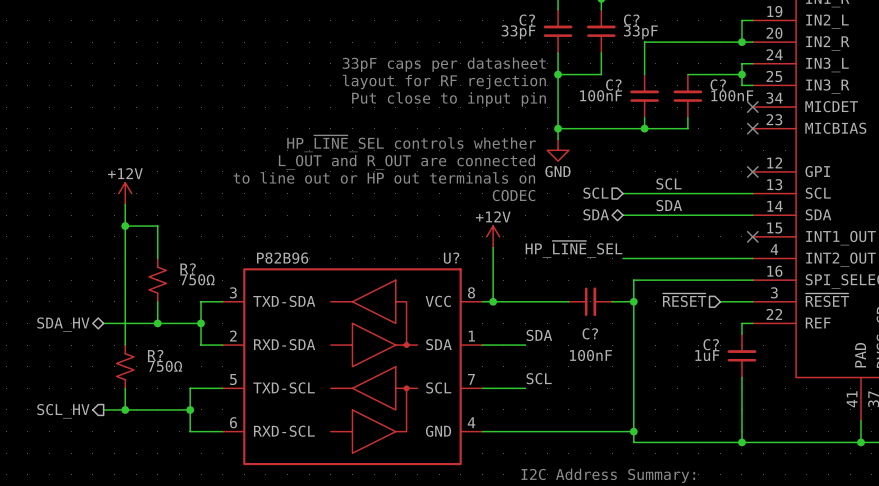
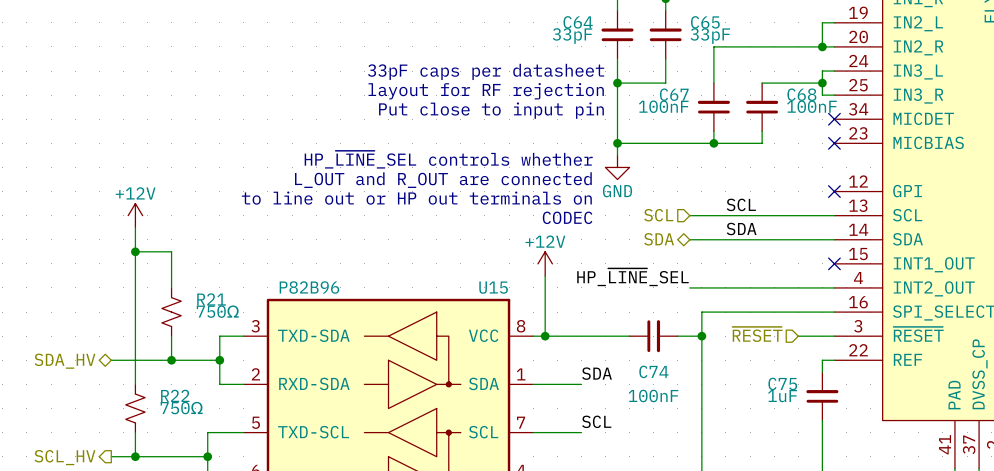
C? name: C? (527, 20) -> C64 (578, 22)
C? name: C? (631, 20) -> C65 (705, 22)
C? name: C? (613, 85) -> C67 (674, 94)
C? name: C? (718, 85) -> C68 (801, 94)
U? name: U? (451, 258) -> U15 (493, 287)
R? name: R? (188, 268) -> R21 (211, 299)
C? name: C? (590, 333) -> C74 (653, 371)
C? name: C? (711, 344) -> C75 (782, 383)
R? name: R? (155, 355) -> R22 (175, 395)

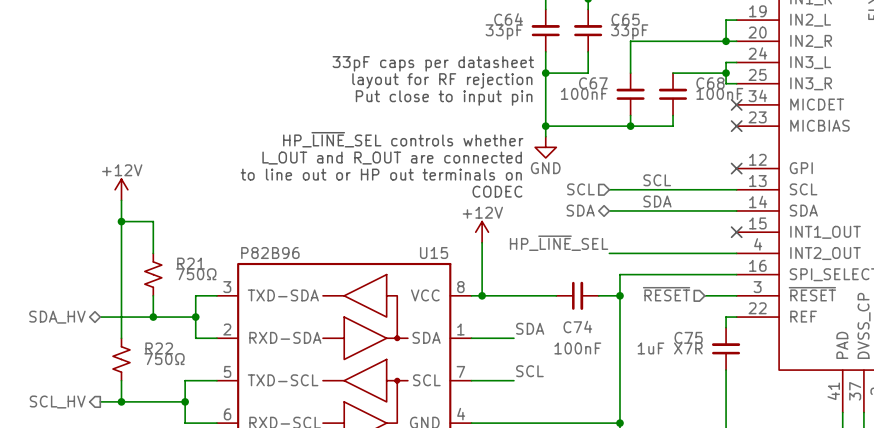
C75 value: 1uF (782, 396) -> 1uF X7R (670, 348)

